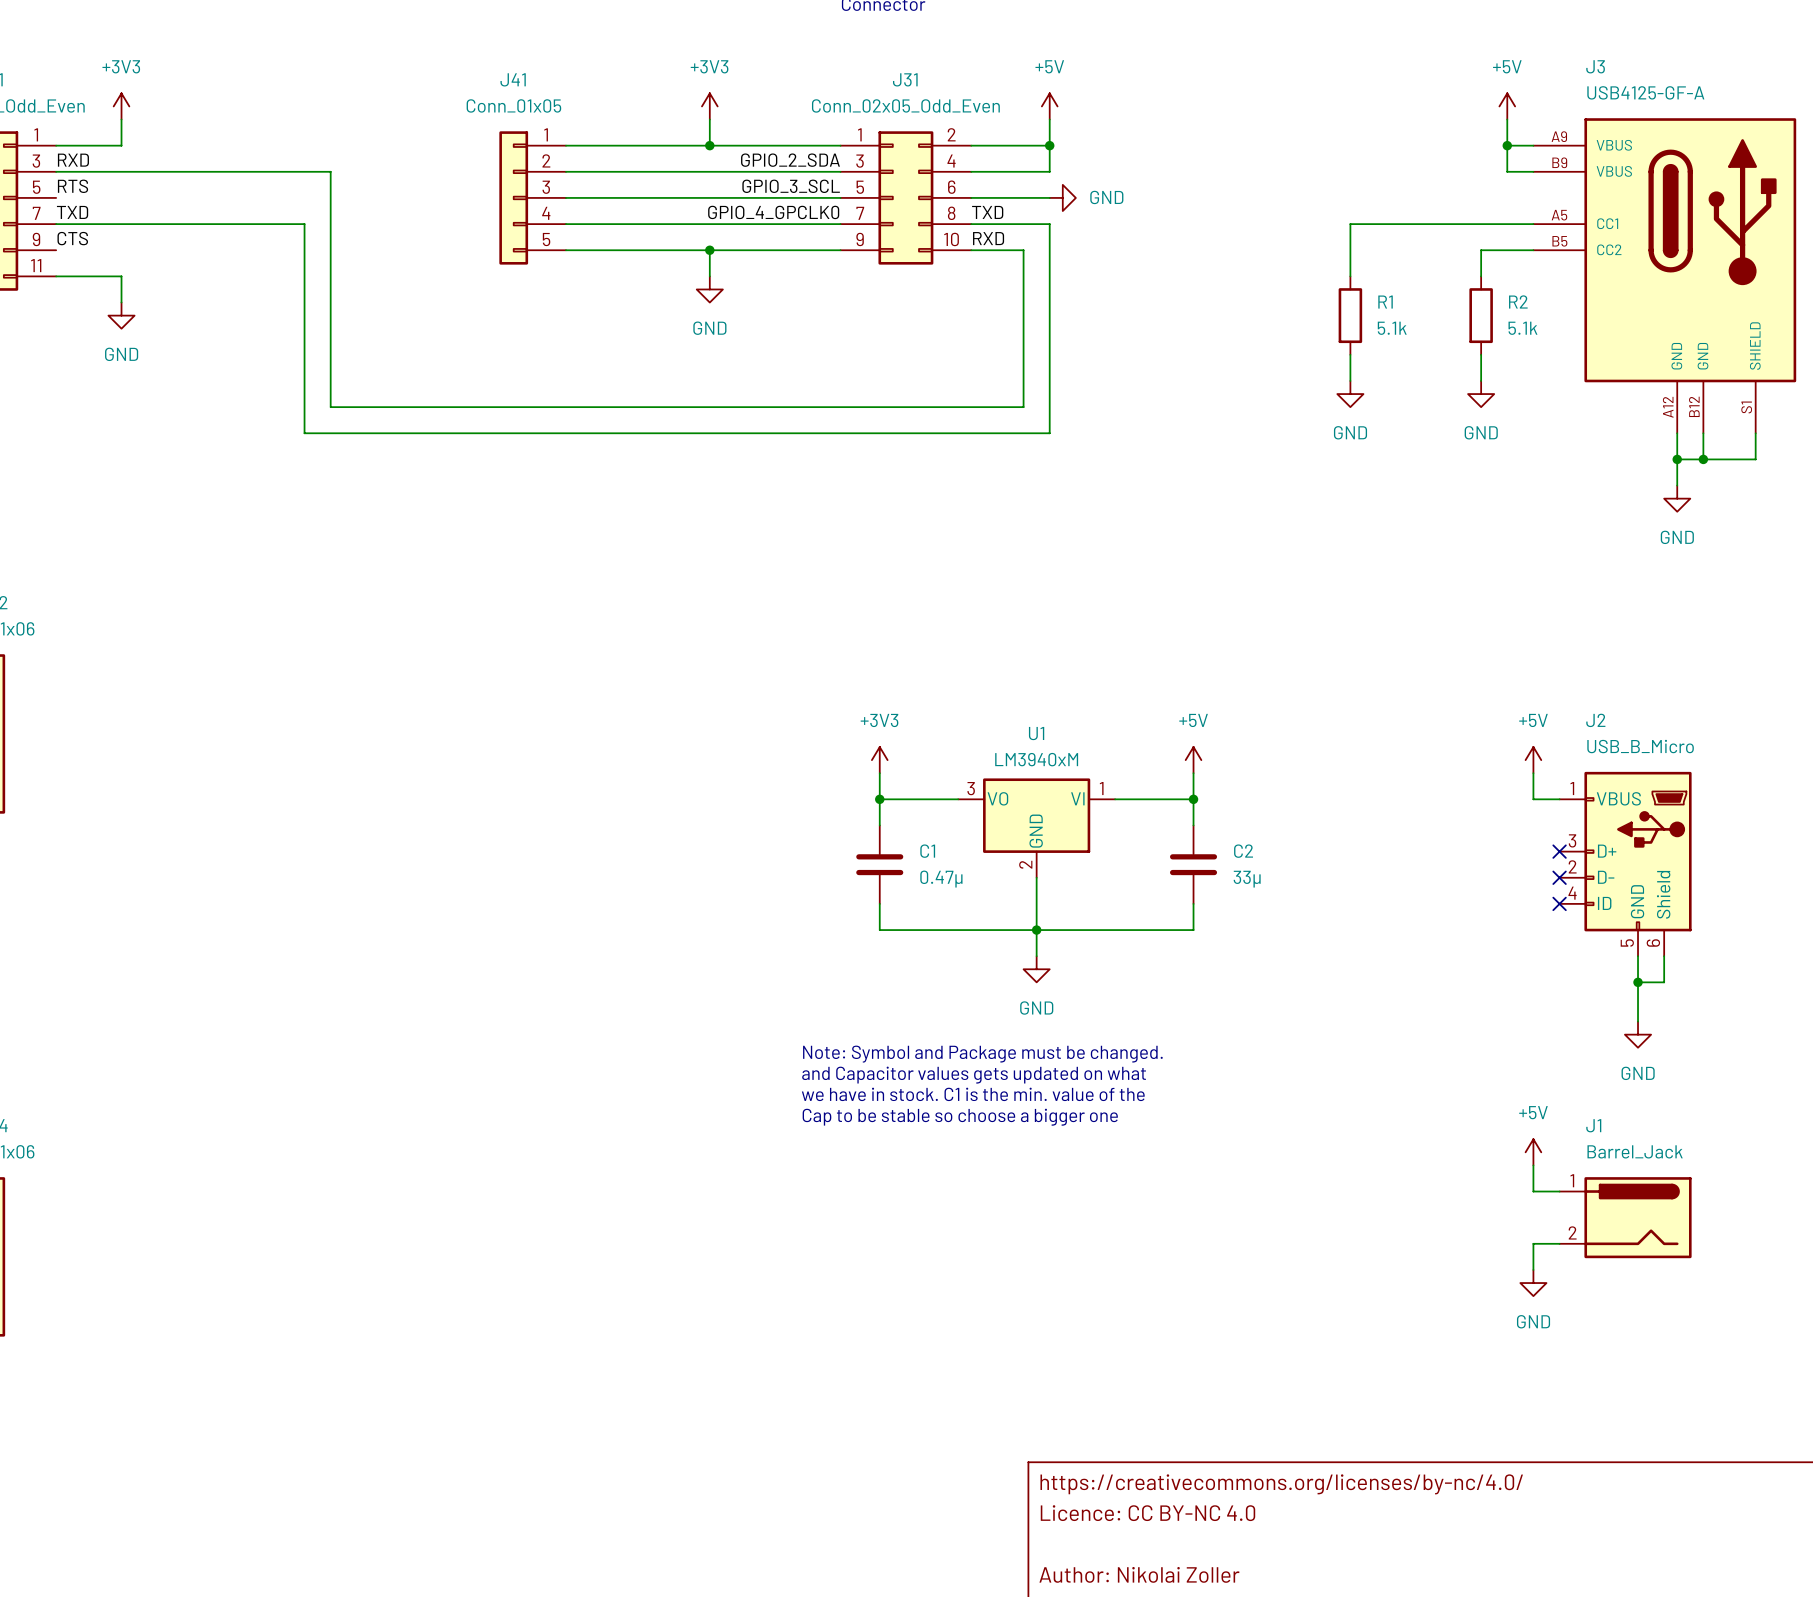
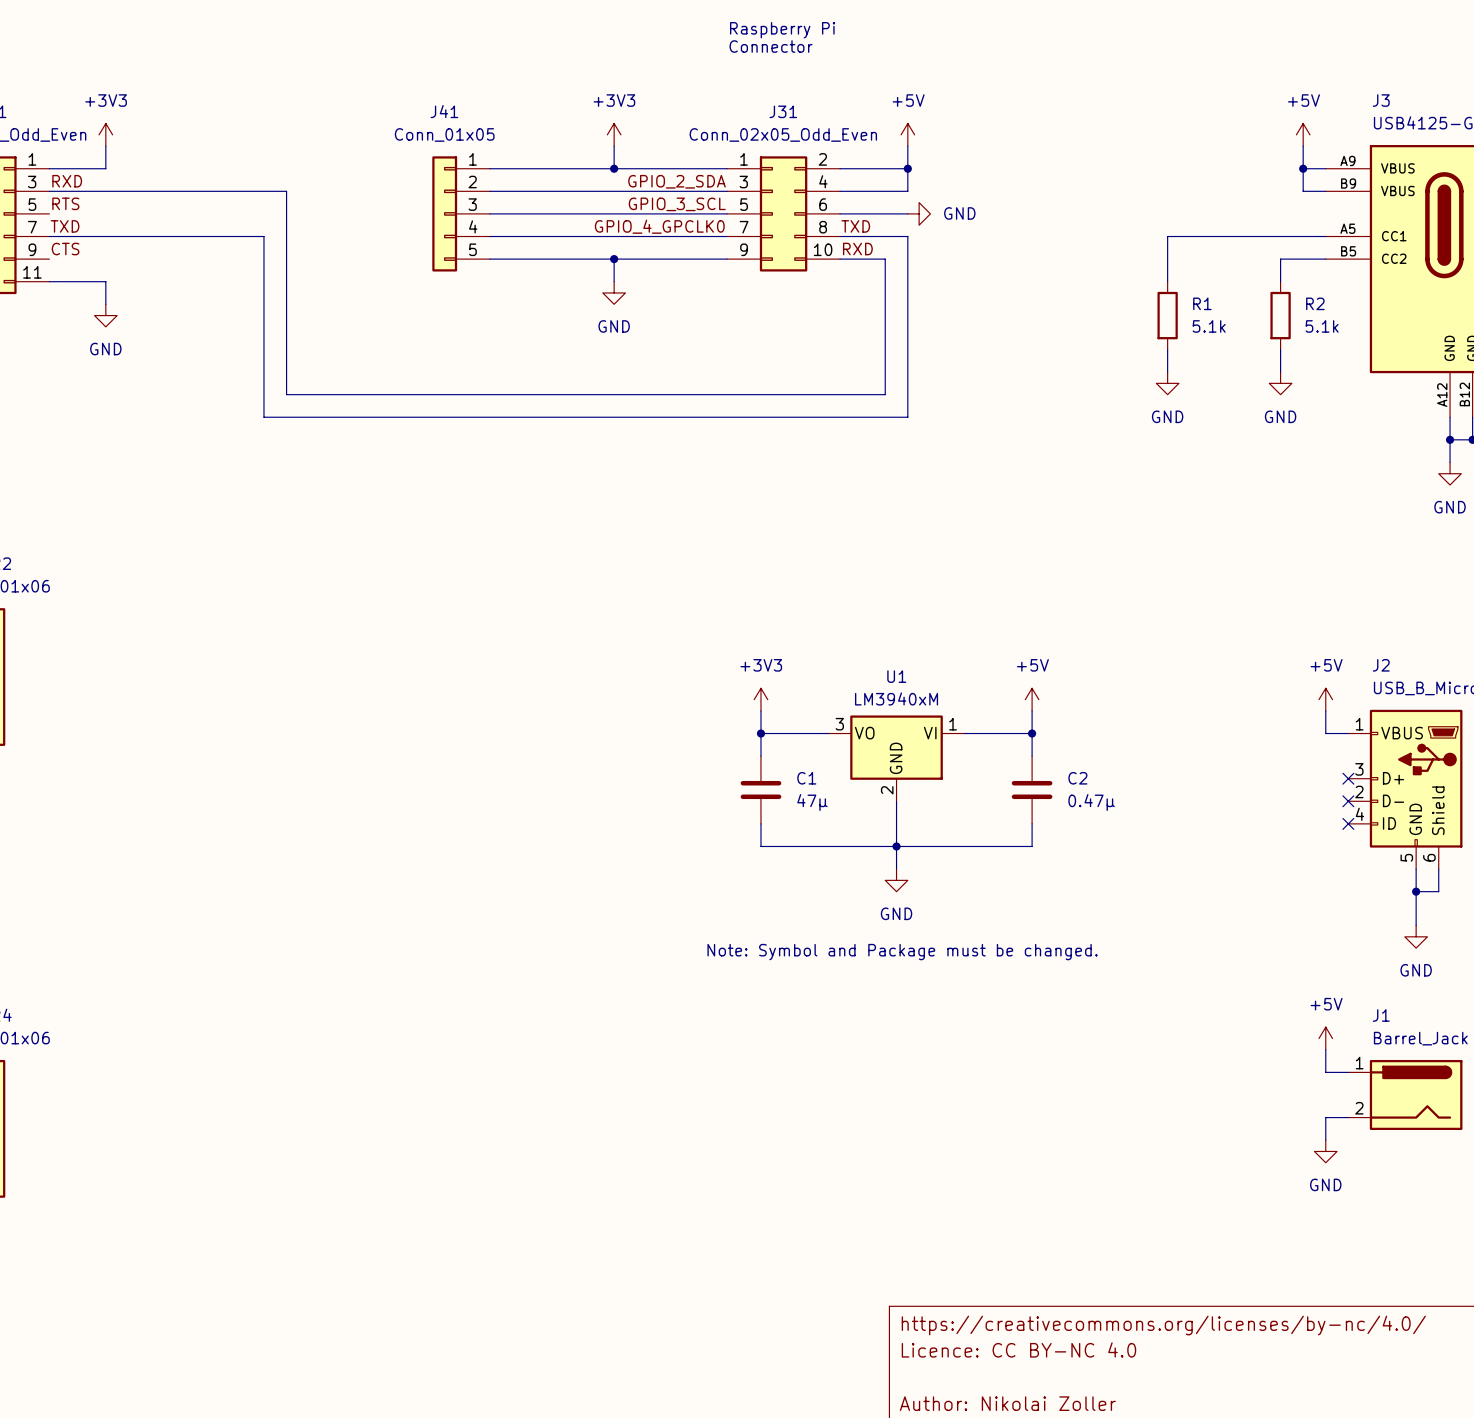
C1 value: 0.47µ (941, 879) -> 47µ (812, 802)
C2 value: 33µ (1247, 879) -> 0.47µ (1091, 802)
text position: Note: Symbol and Package must be changed. (982, 1054) -> Note: Symbol and Package must be changed. (902, 952)
text: and Capacitor values gets updated on what (974, 1075) -> none
text: we have in stock. C1 is the min. value of the (973, 1094) -> none
text: Cap to be stable so choose a bigger one (960, 1117) -> none

